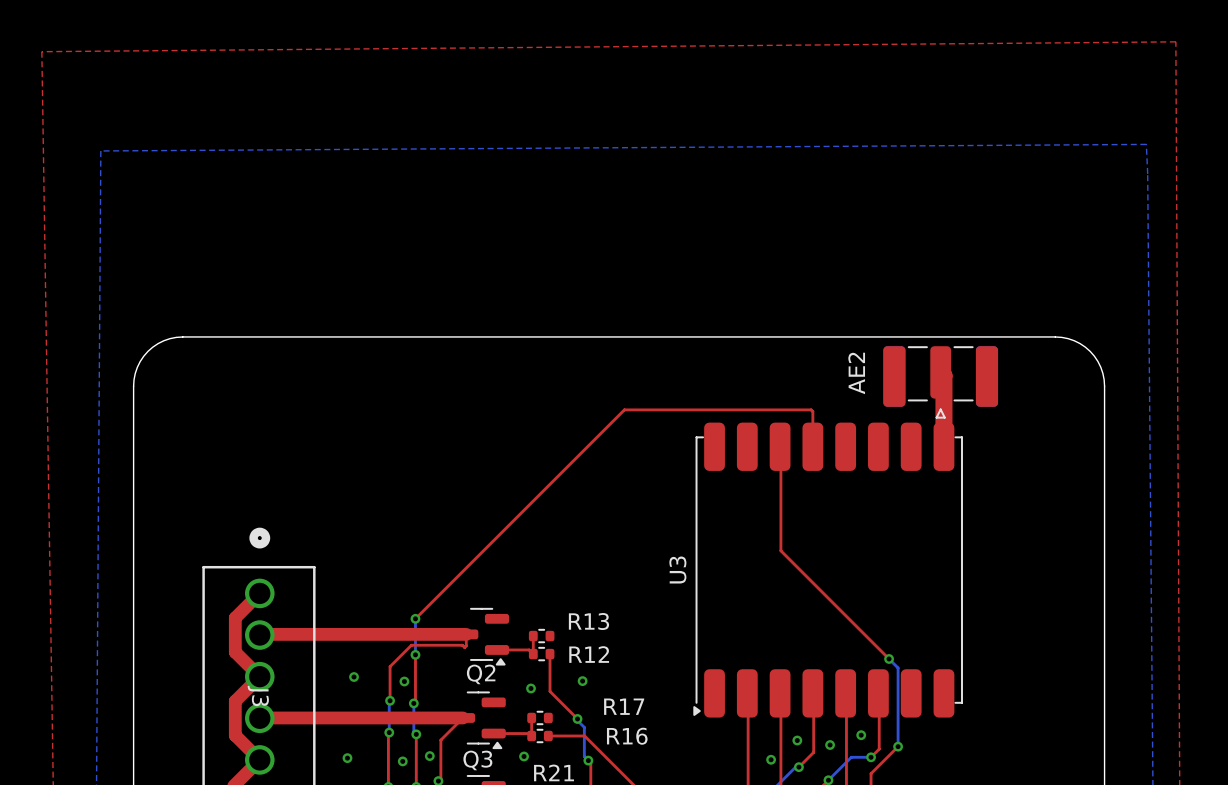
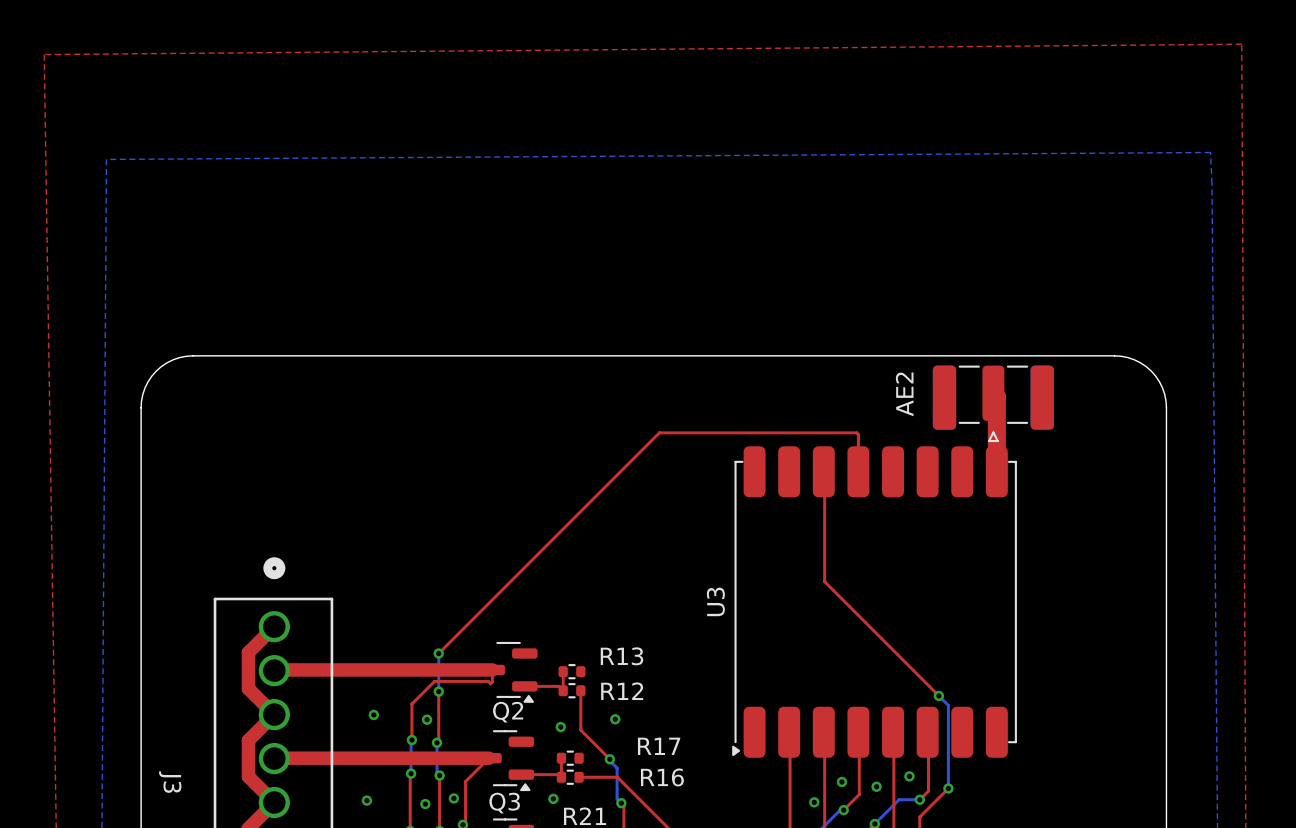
J3 name position: J3 (258, 696) -> J3 (170, 782)

